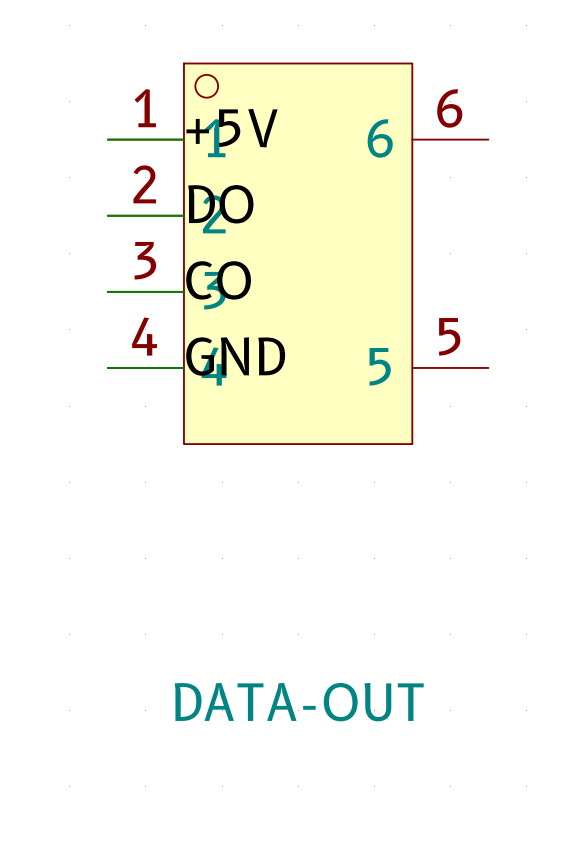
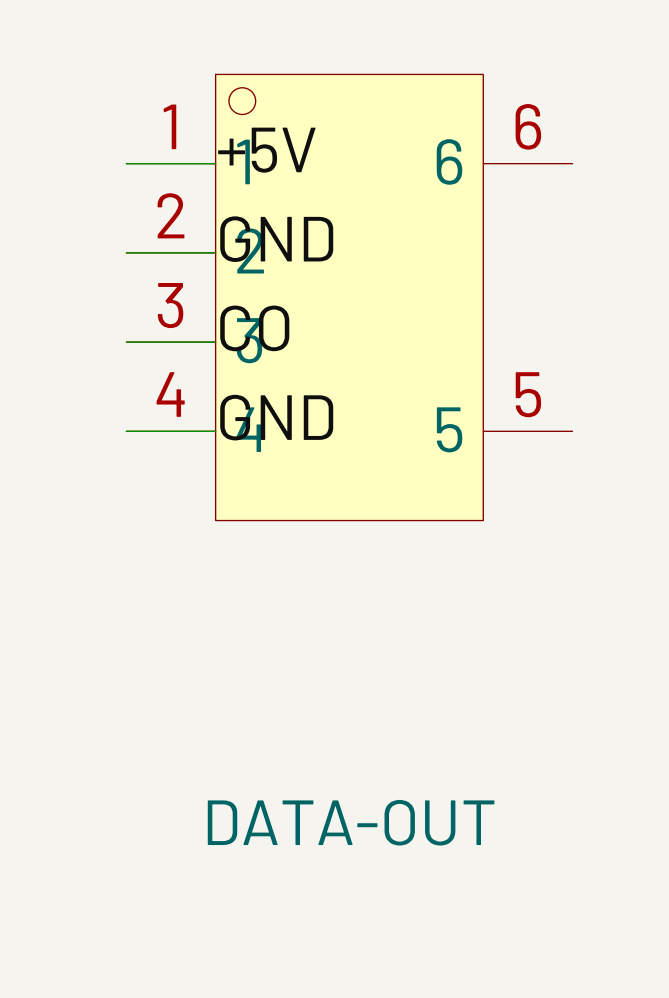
label: DO (220, 204) -> GND (276, 239)

